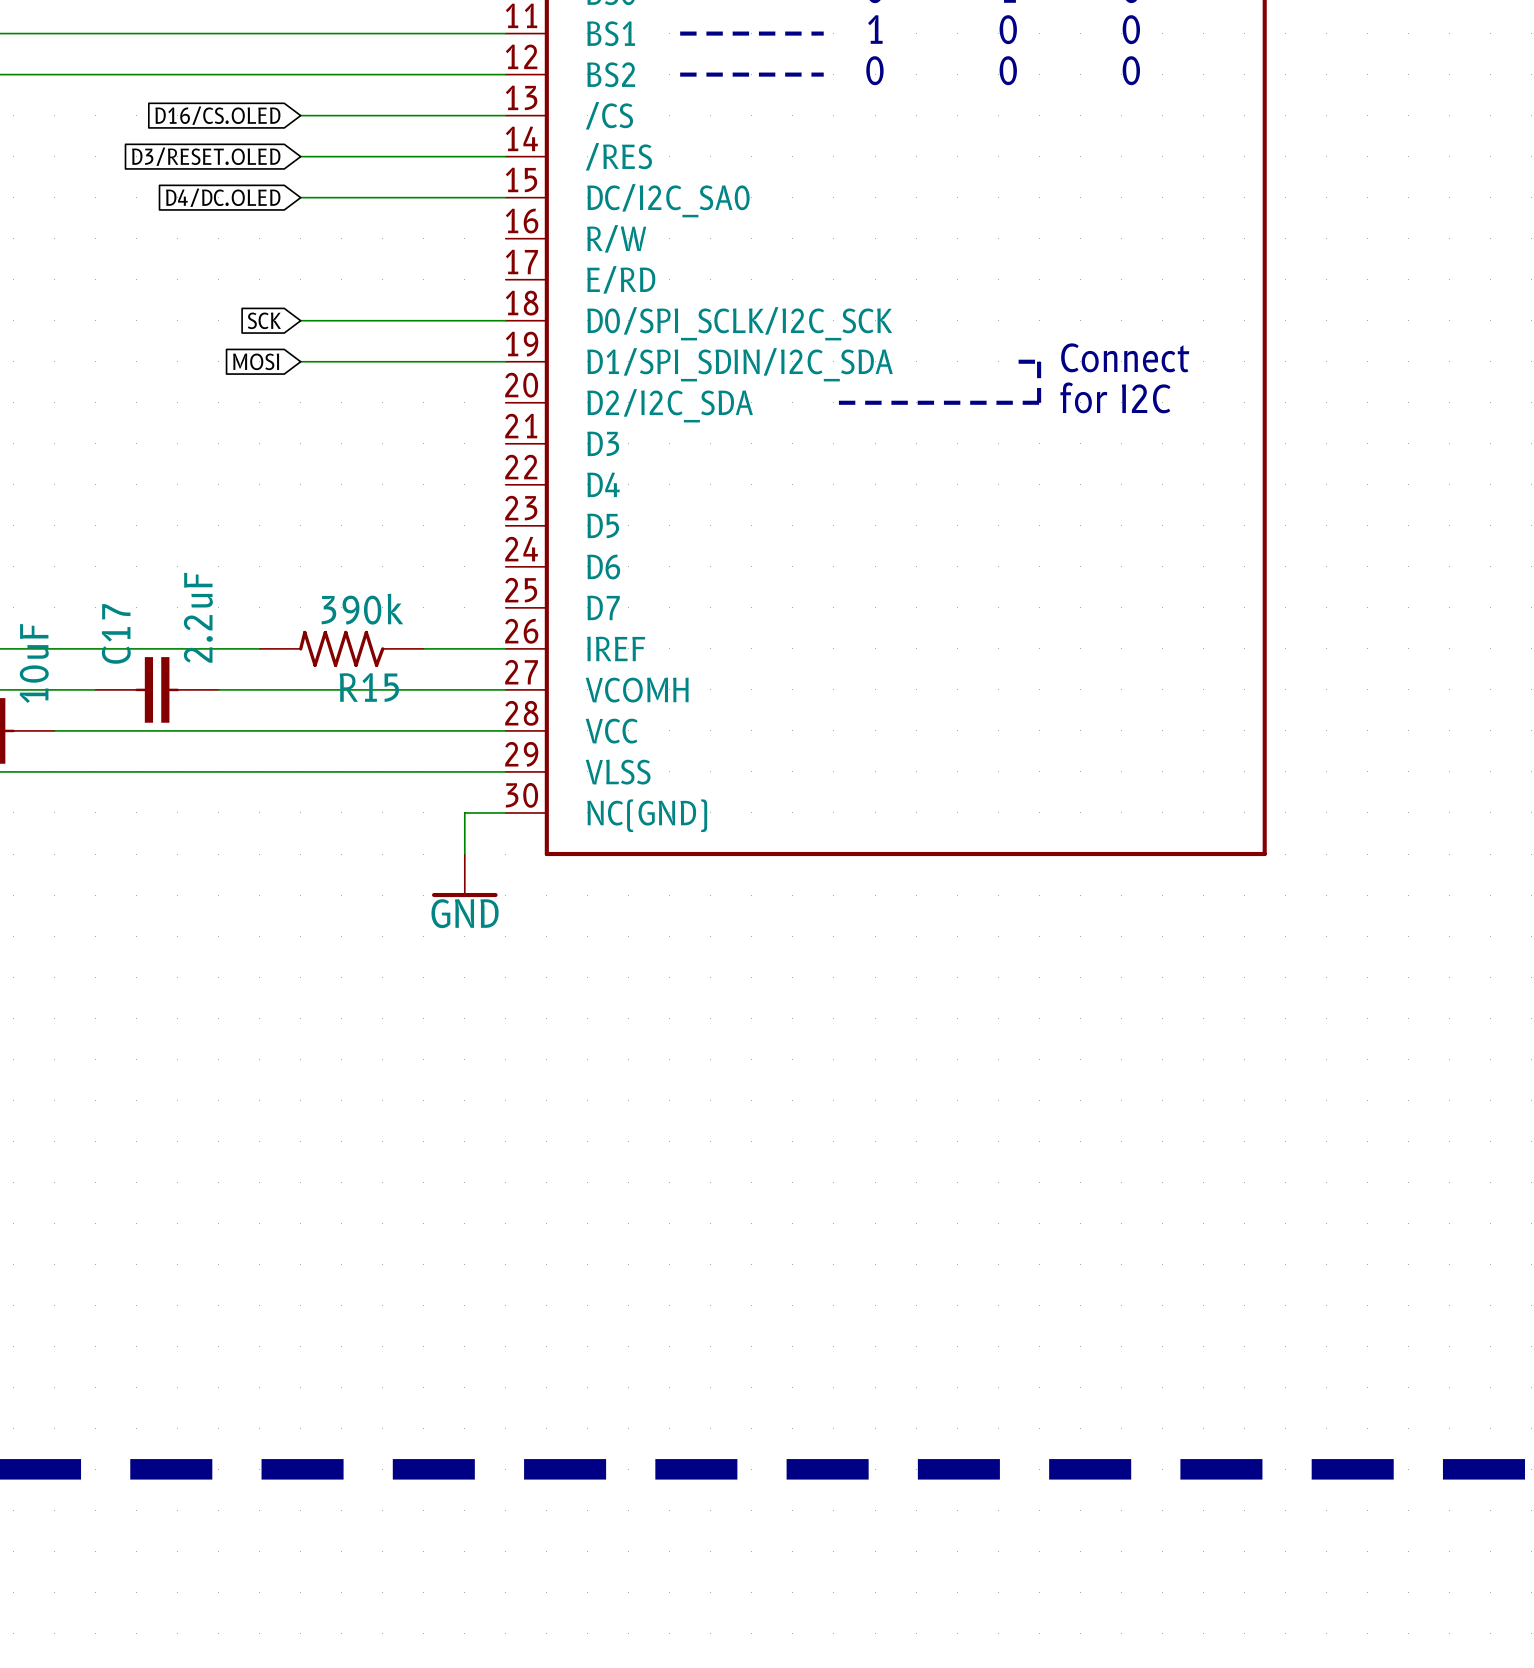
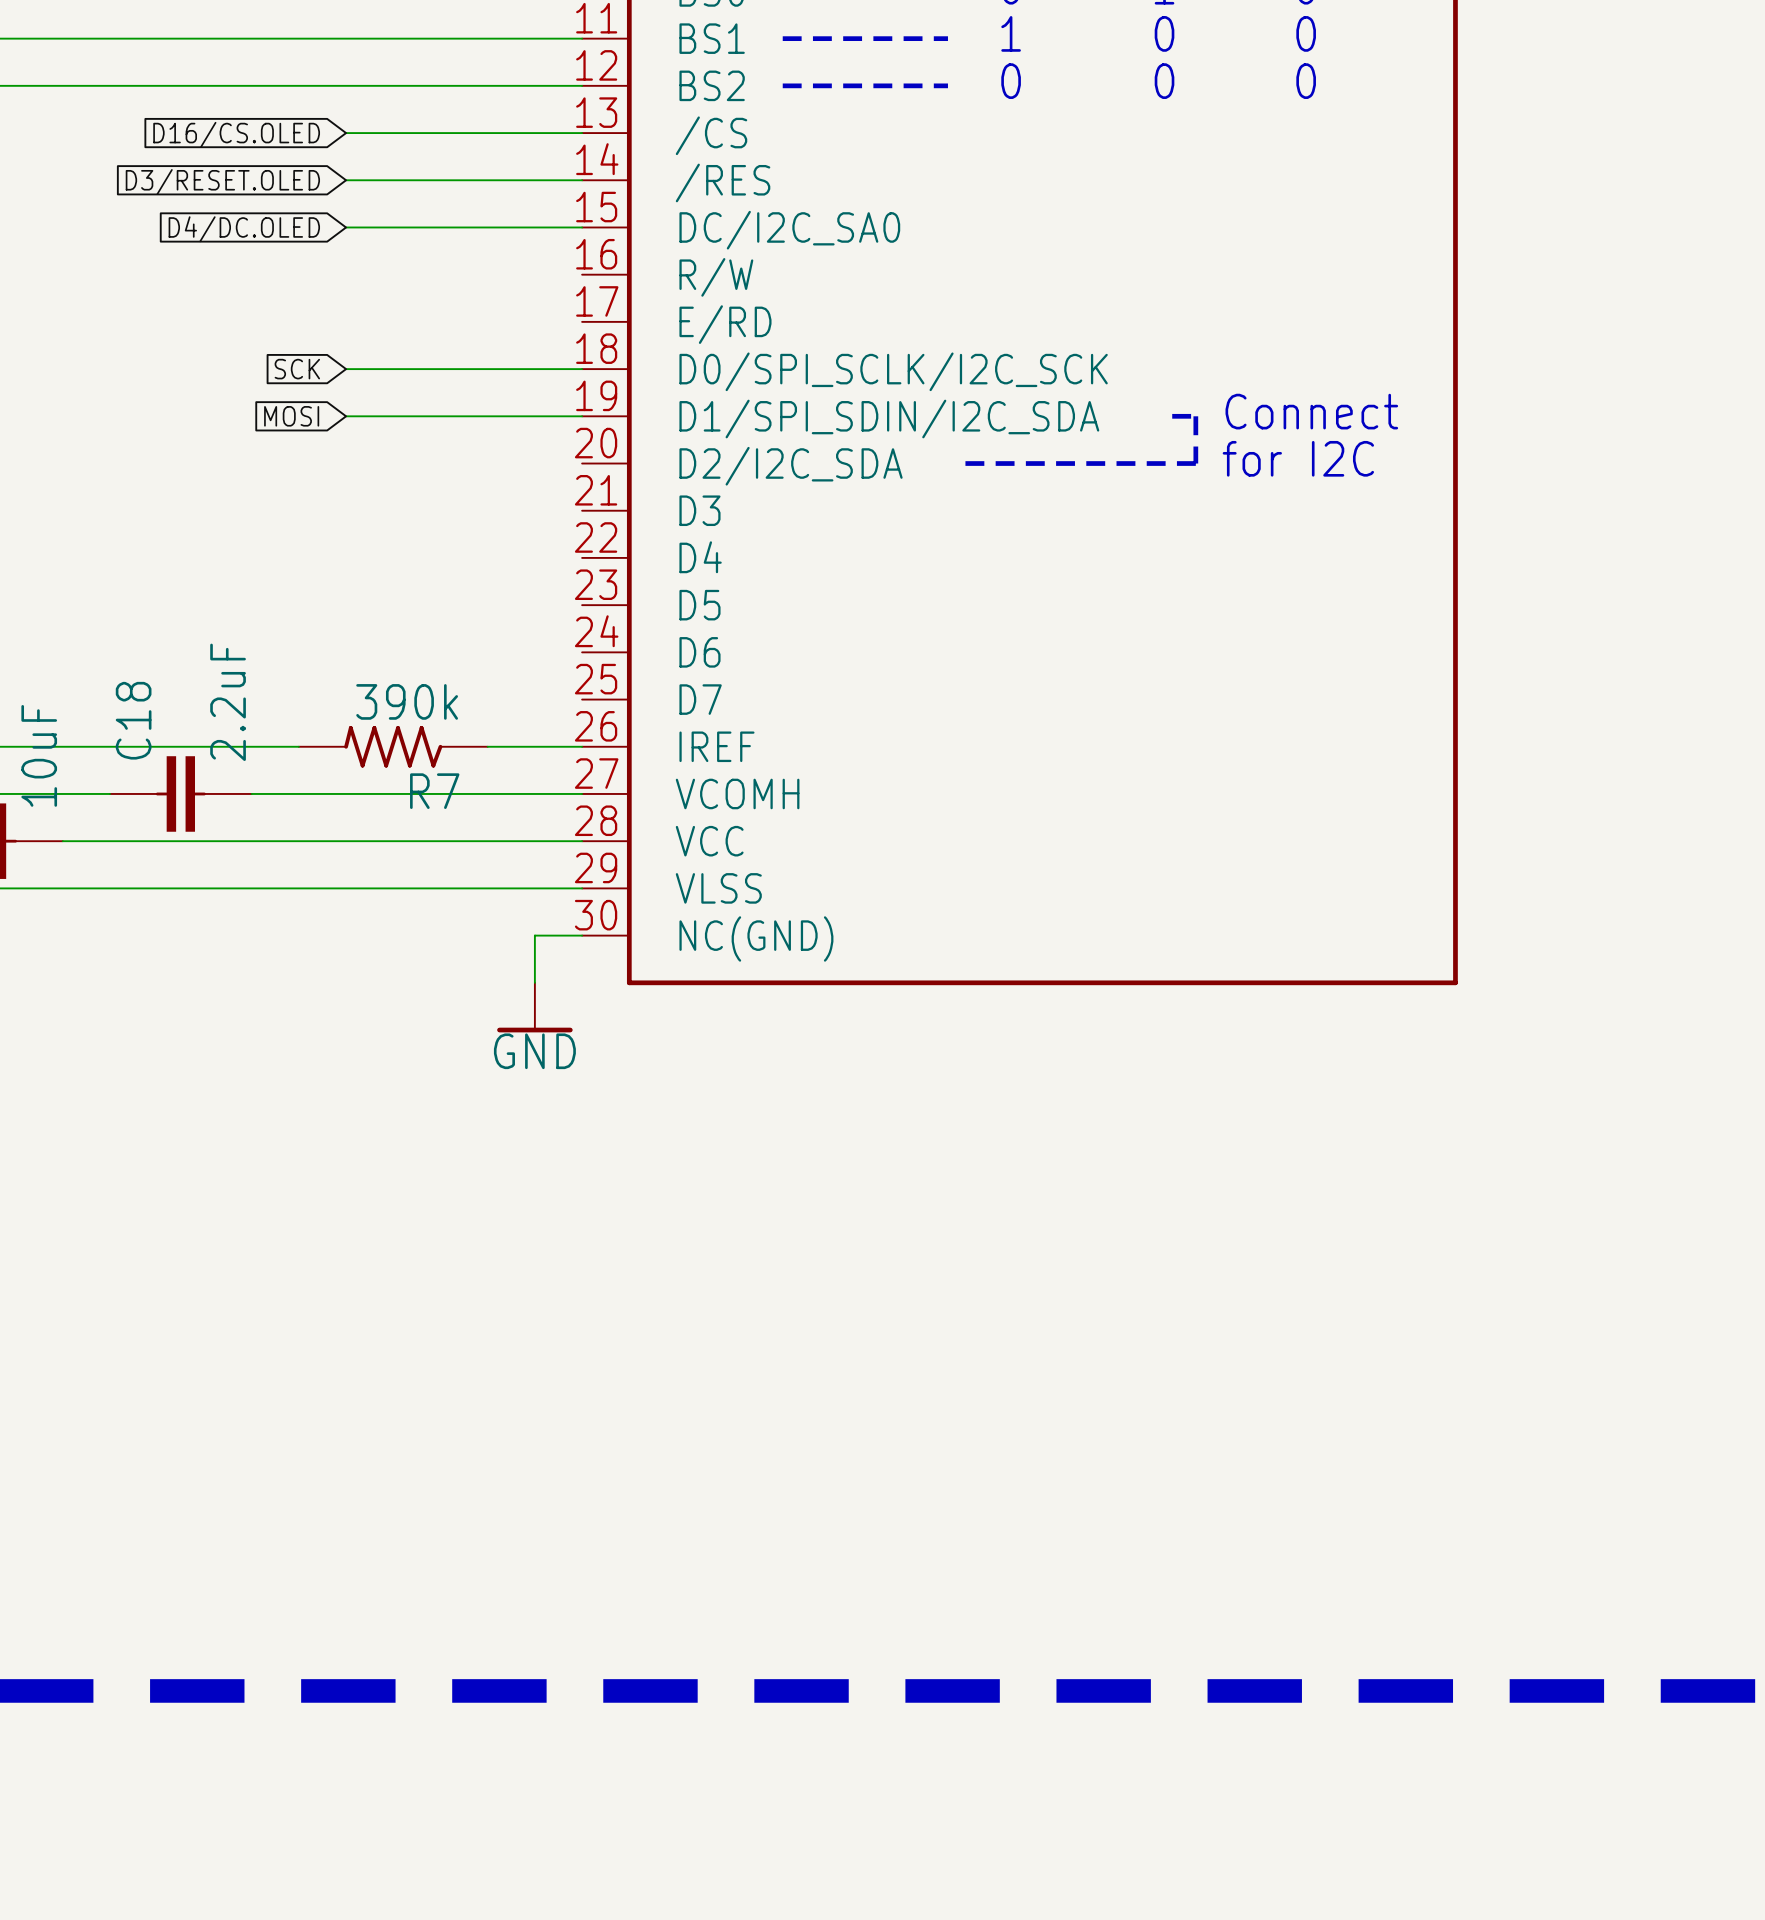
C17 name: C17 (116, 633) -> C18 (133, 720)
R15 name: R15 (369, 687) -> R7 (434, 791)

